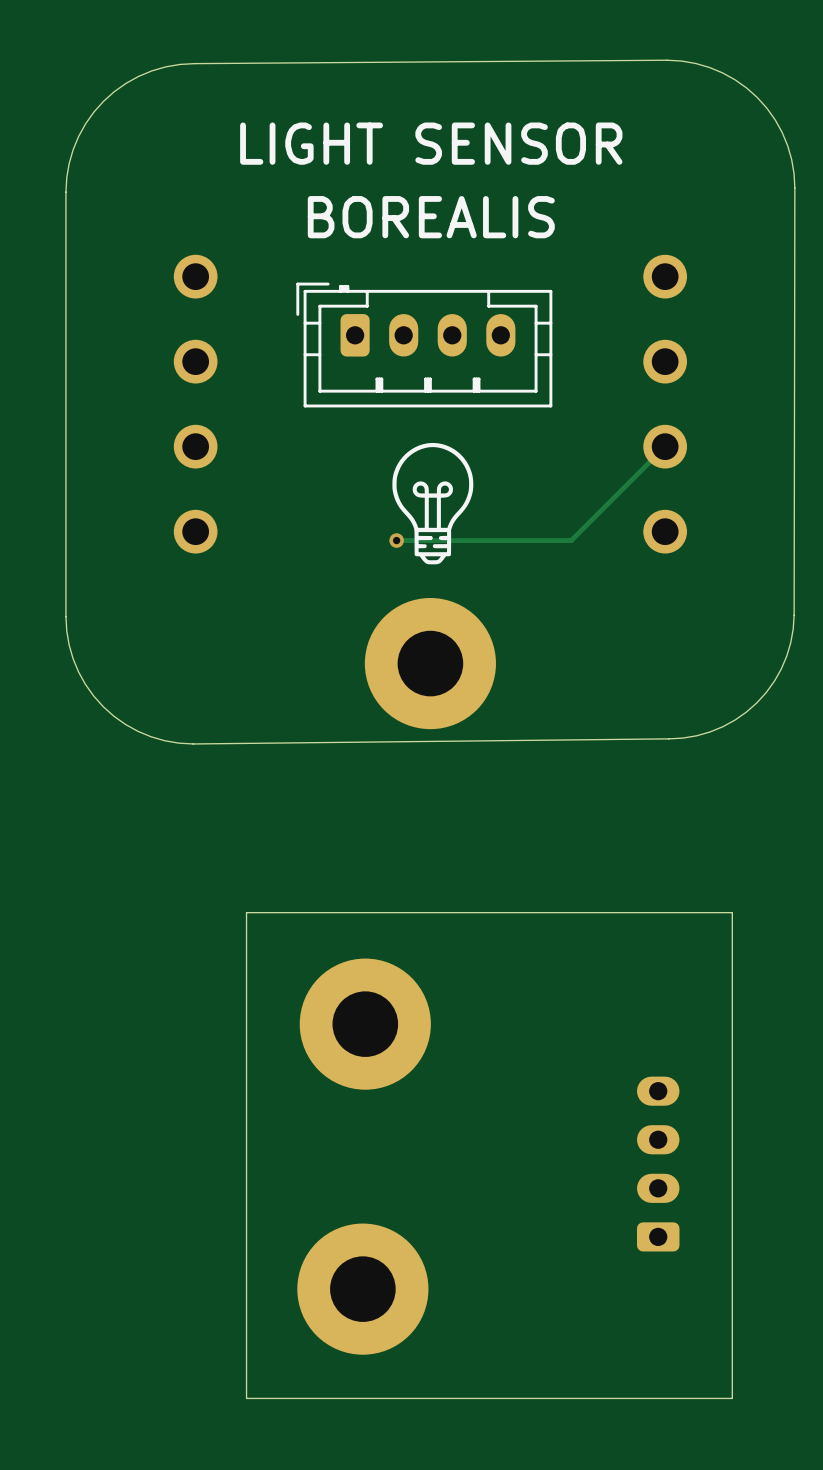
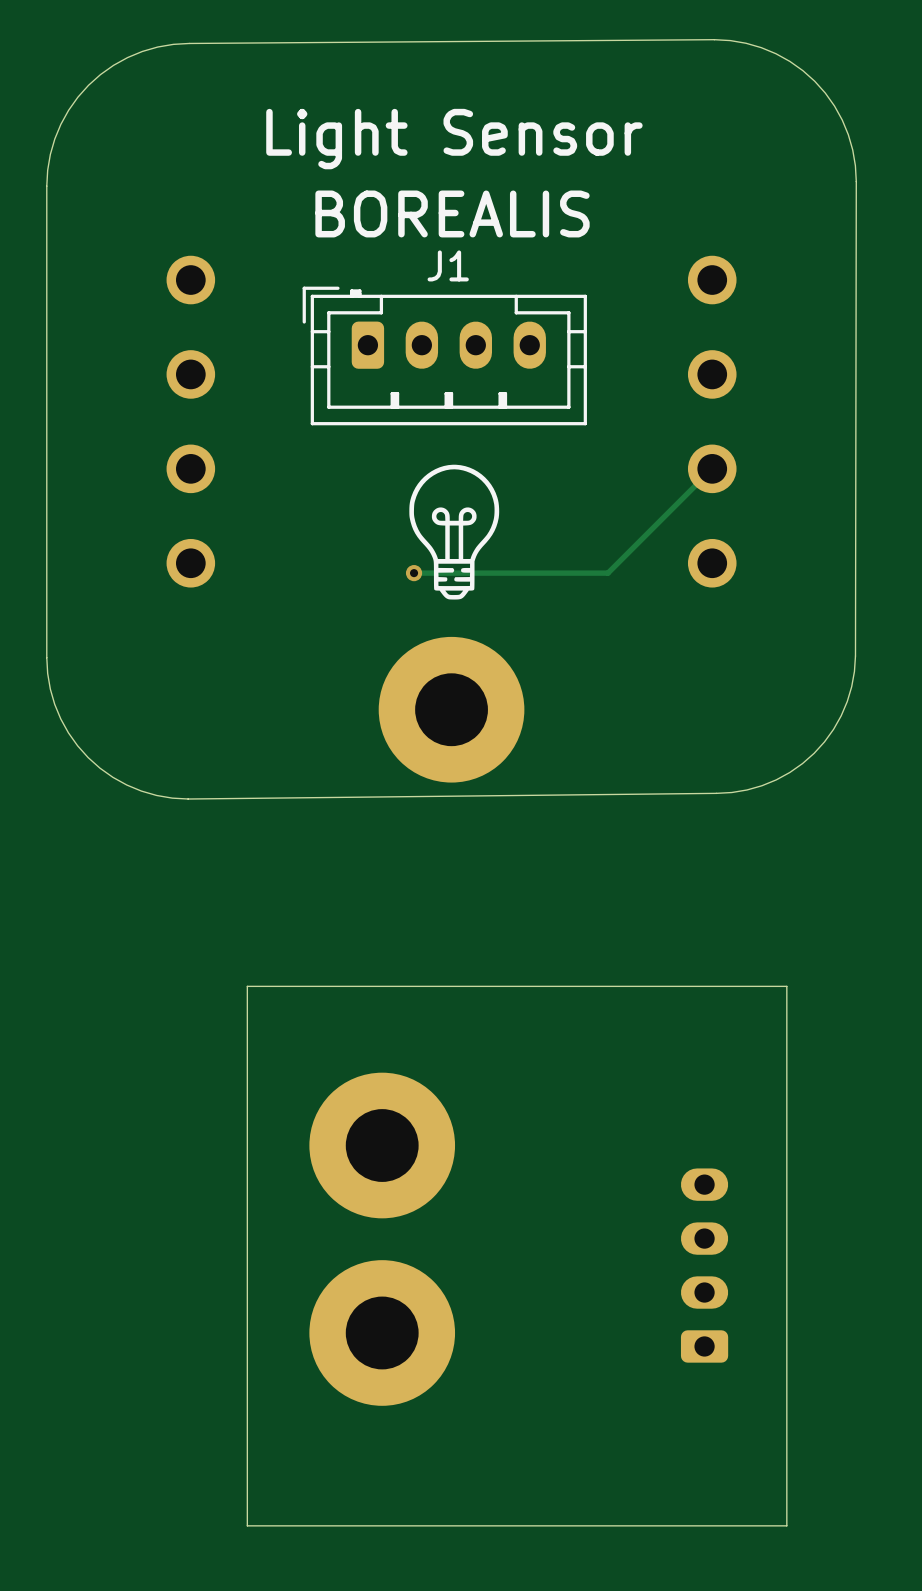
text: LIGHT SENSOR (431, 143) -> Light Sensor (454, 139)
J1 name: none -> J1 (448, 265)
part position: (365, 1024) -> (382, 1145)
part position: (362, 1289) -> (382, 1332)

